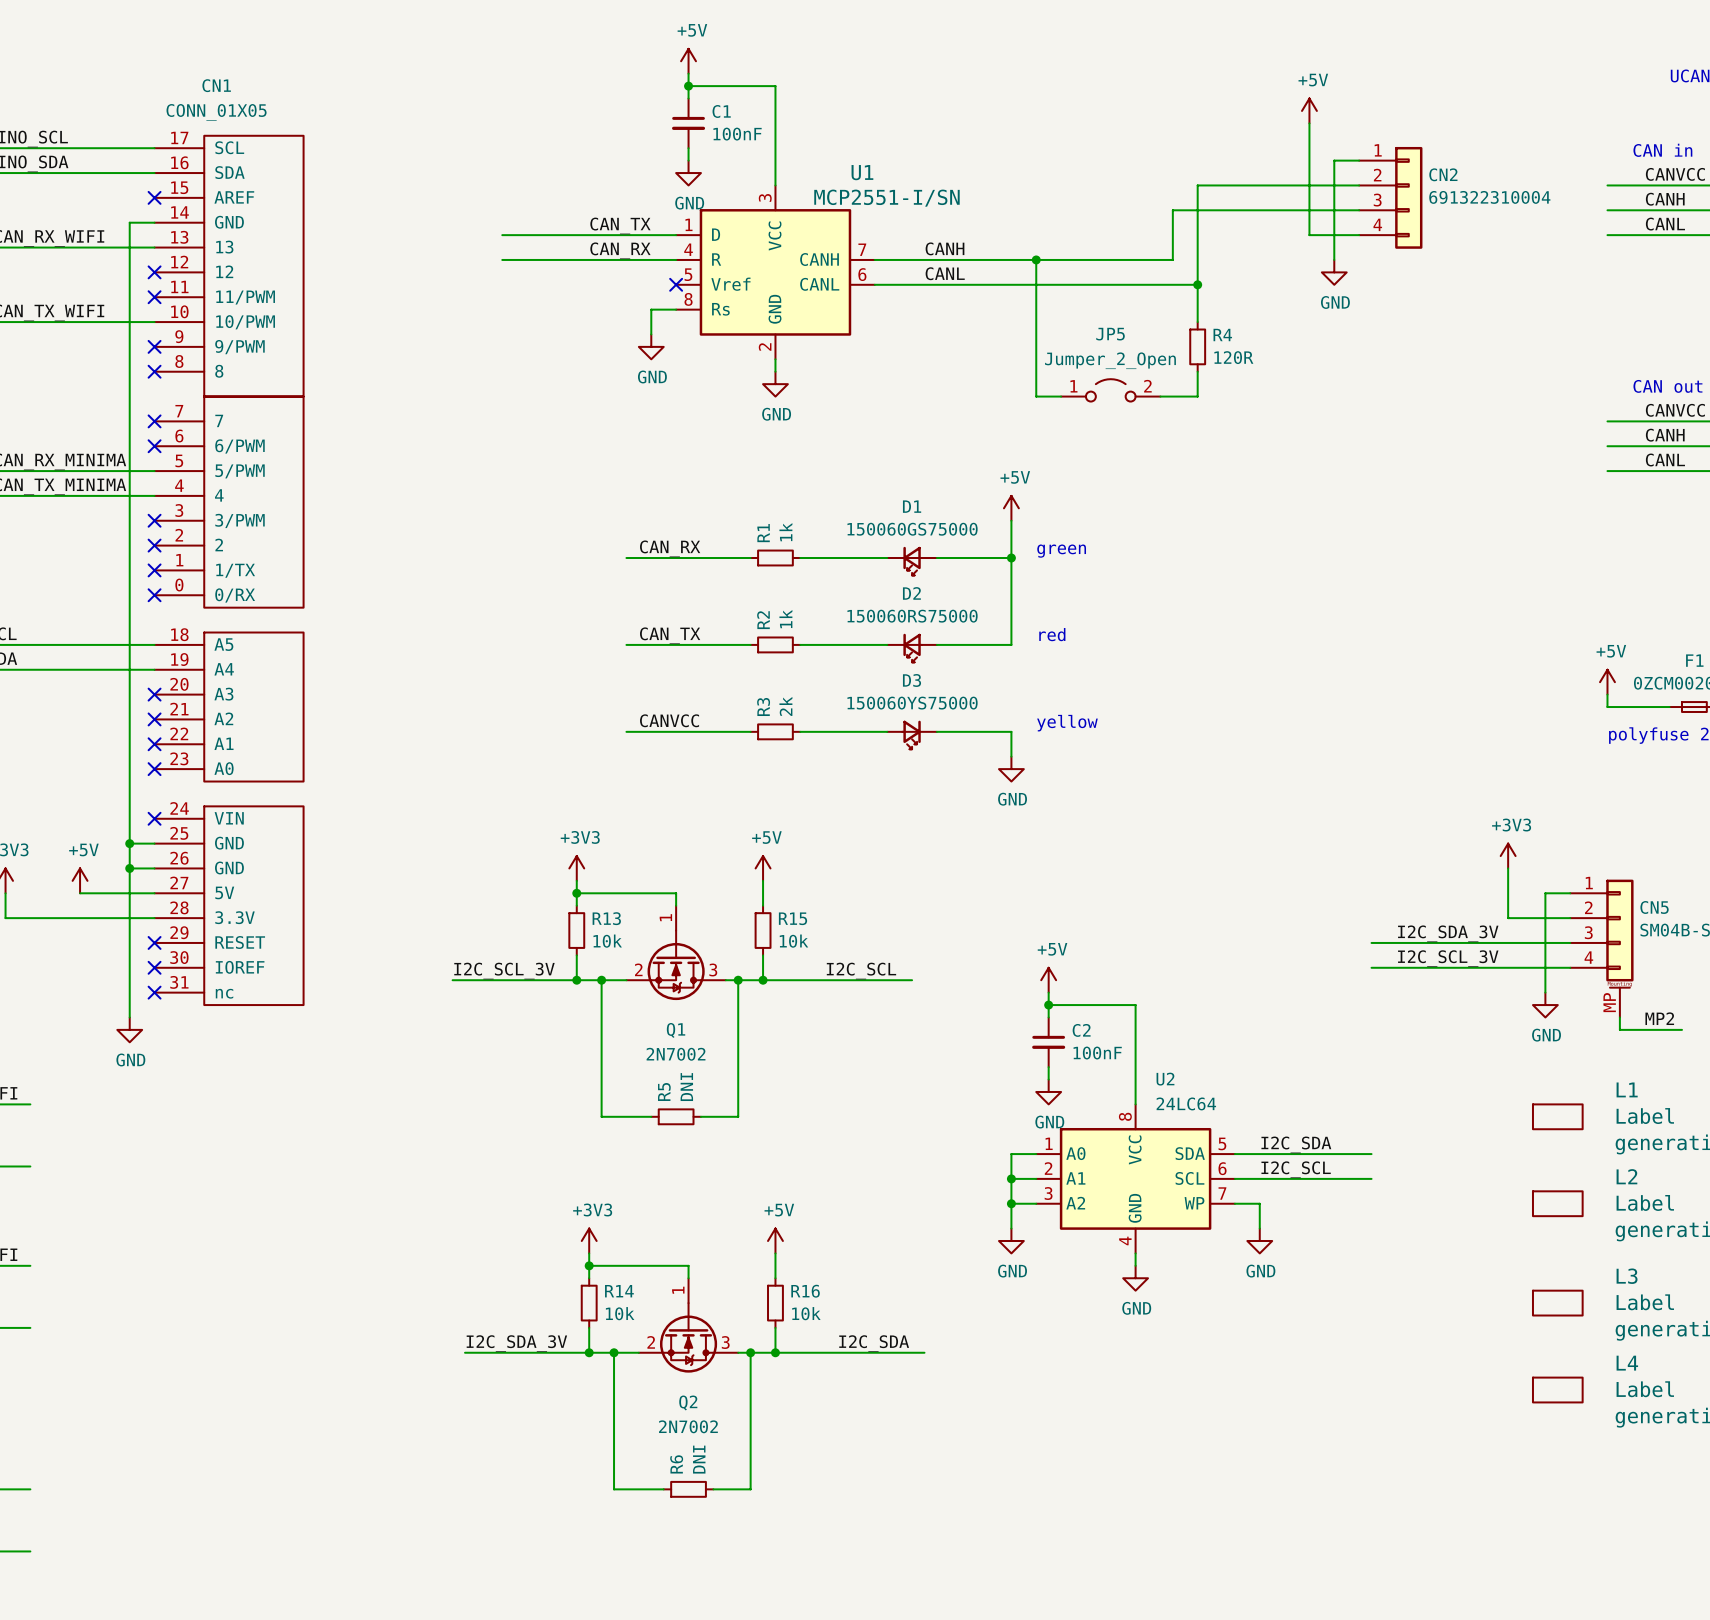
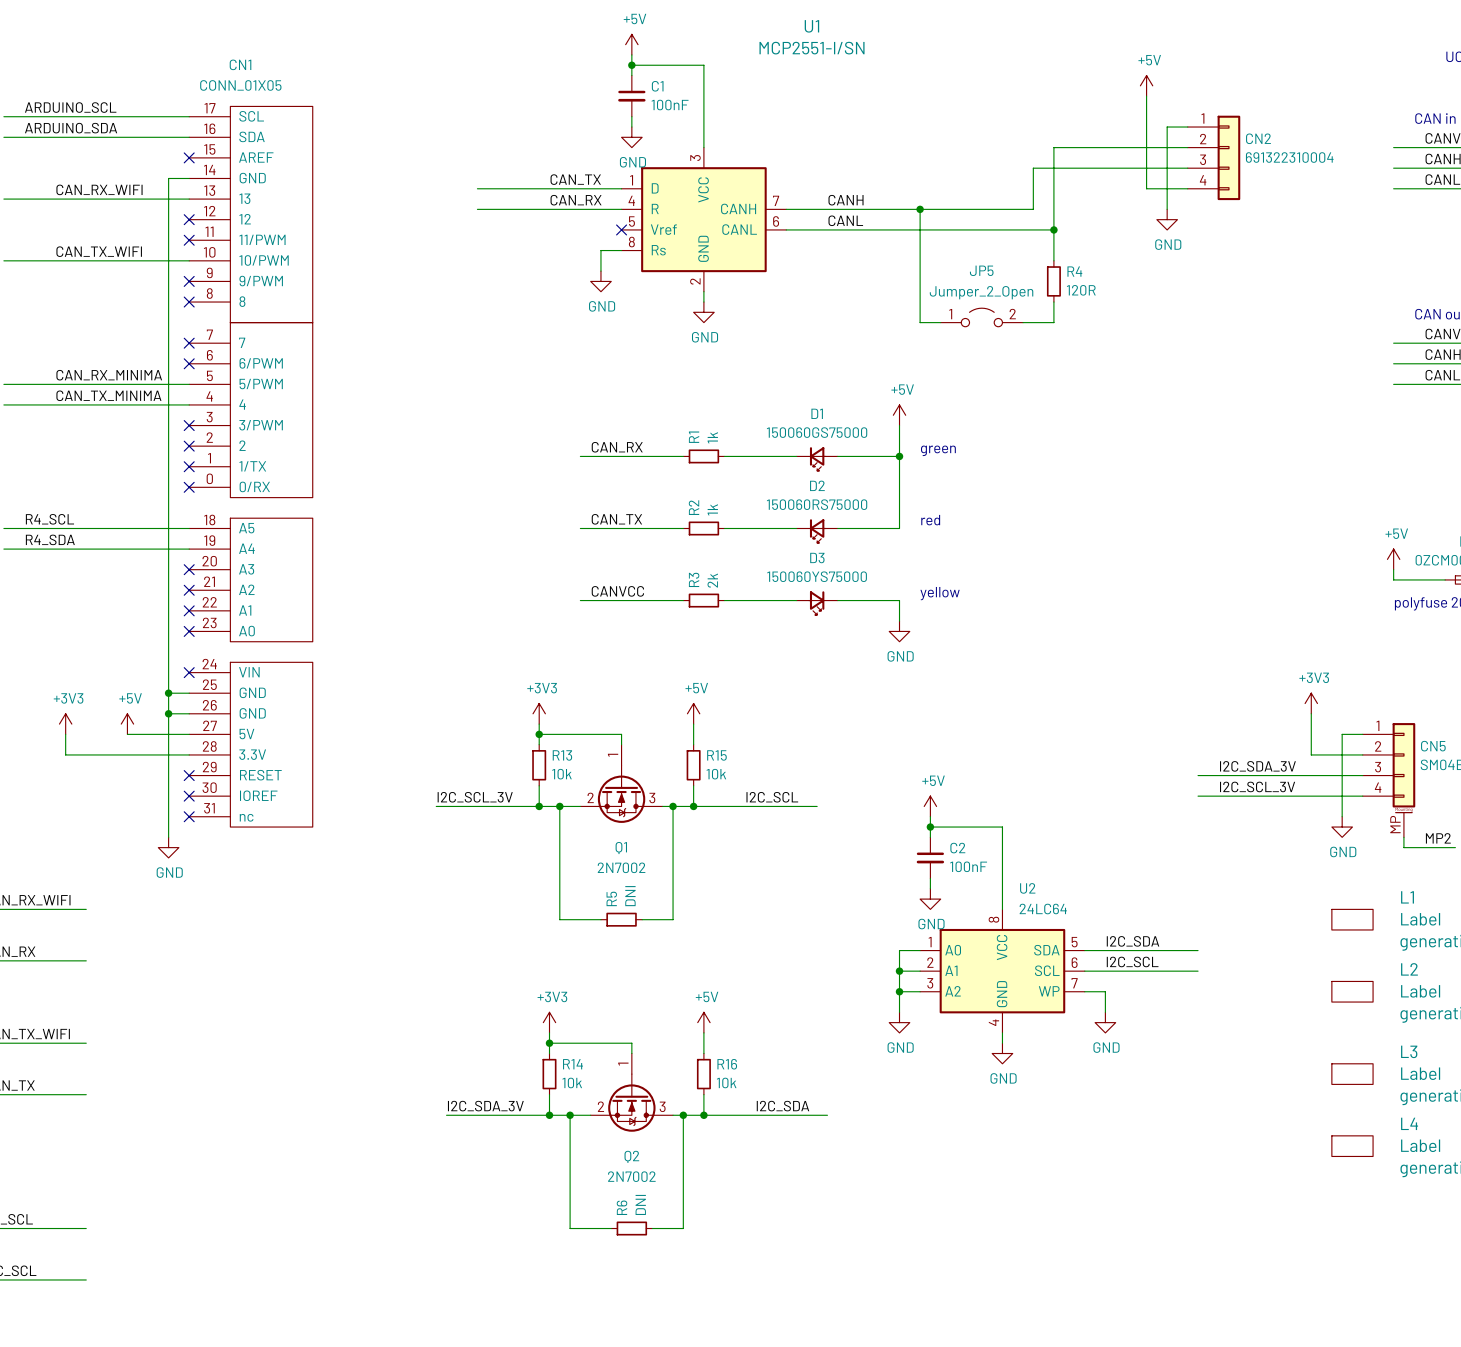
U1 name position: U1 (862, 172) -> U1 (811, 26)
U1 value position: MCP2551-I/SN (886, 198) -> MCP2551-I/SN (812, 48)

